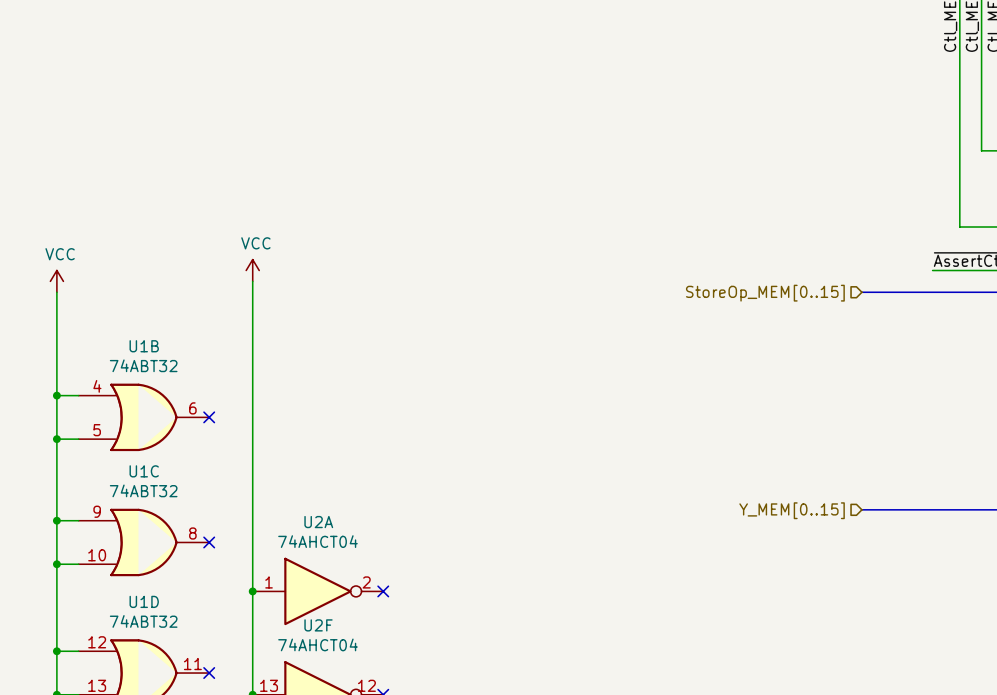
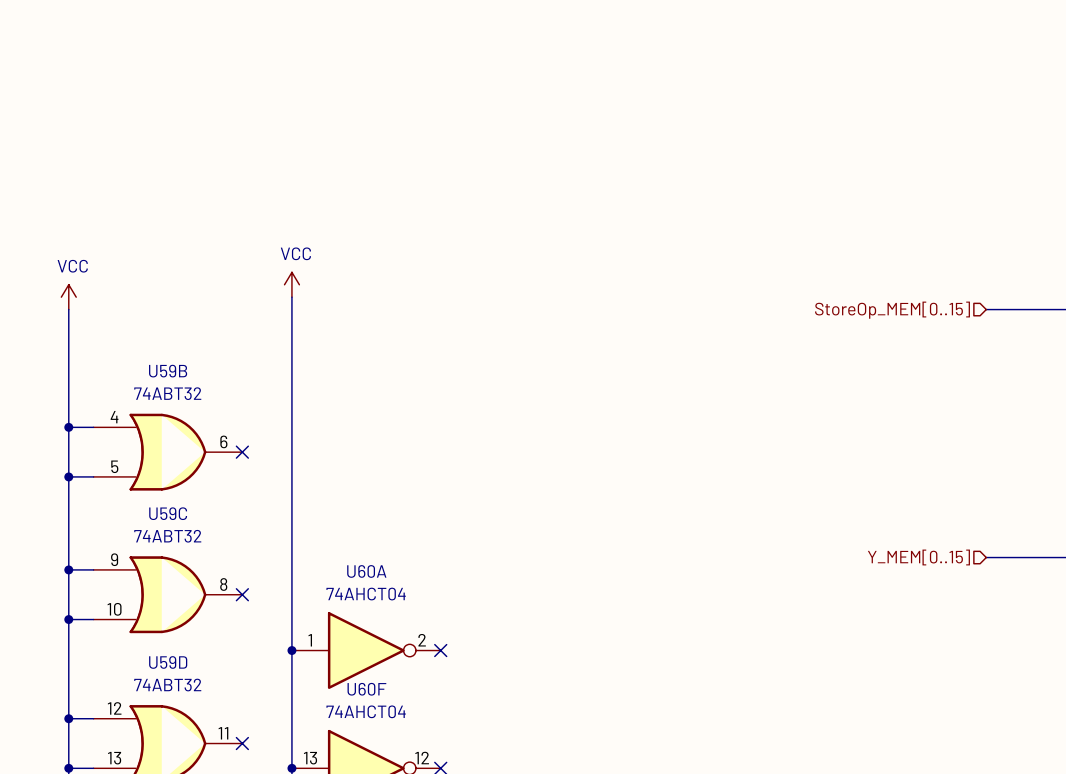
U1B name: U1B (144, 346) -> U59B (168, 371)
U1C name: U1C (144, 471) -> U59C (168, 513)
U2A name: U2A (318, 522) -> U60A (366, 571)
U1D name: U1D (144, 601) -> U59D (168, 662)
U2F name: U2F (318, 625) -> U60F (366, 689)

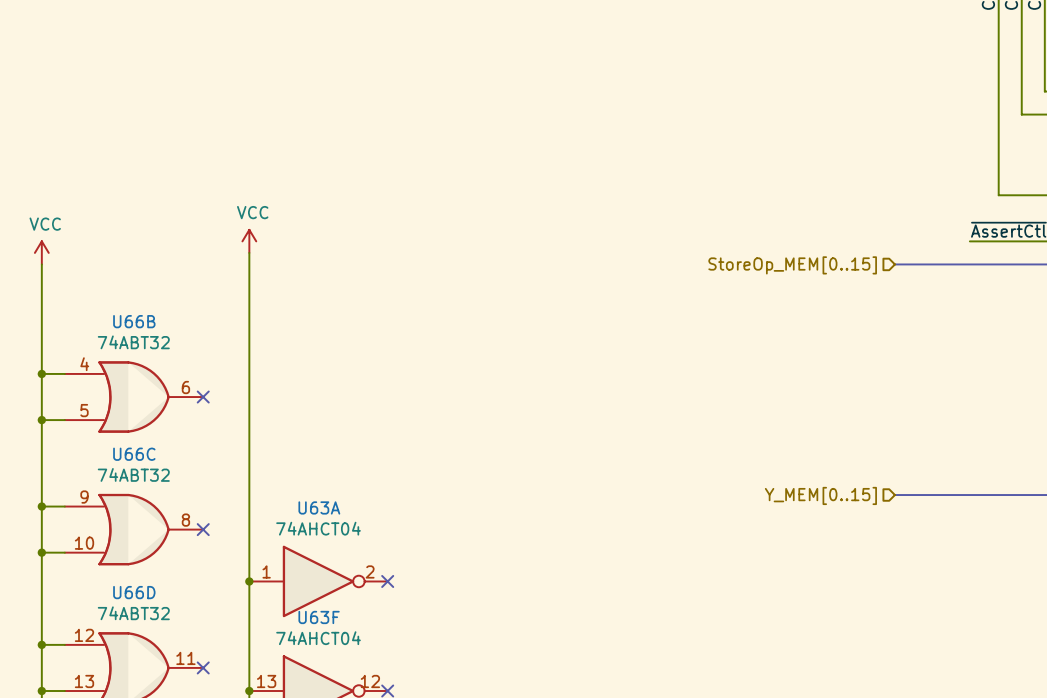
U59B name: U59B (168, 371) -> U66B (134, 321)
U59C name: U59C (168, 513) -> U66C (134, 454)
U60A name: U60A (366, 571) -> U63A (319, 507)
U59D name: U59D (168, 662) -> U66D (134, 592)
U60F name: U60F (366, 689) -> U63F (319, 617)

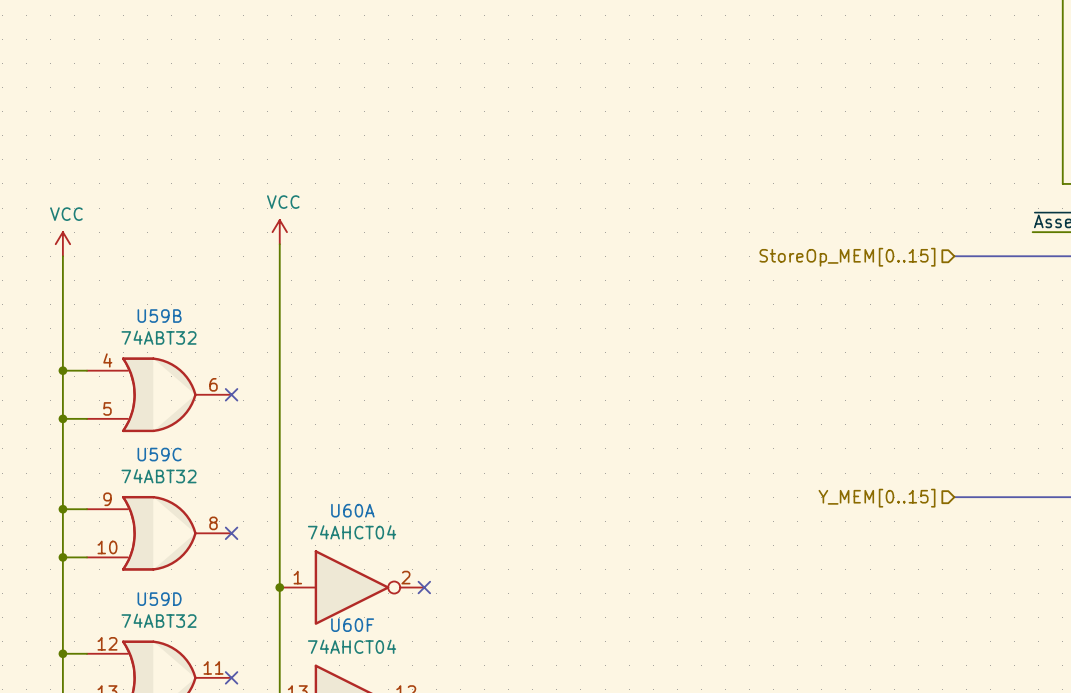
U66B name: U66B (134, 321) -> U59B (159, 316)
U66C name: U66C (134, 454) -> U59C (159, 454)
U63A name: U63A (319, 507) -> U60A (352, 510)
U66D name: U66D (134, 592) -> U59D (159, 599)
U63F name: U63F (319, 617) -> U60F (352, 625)

